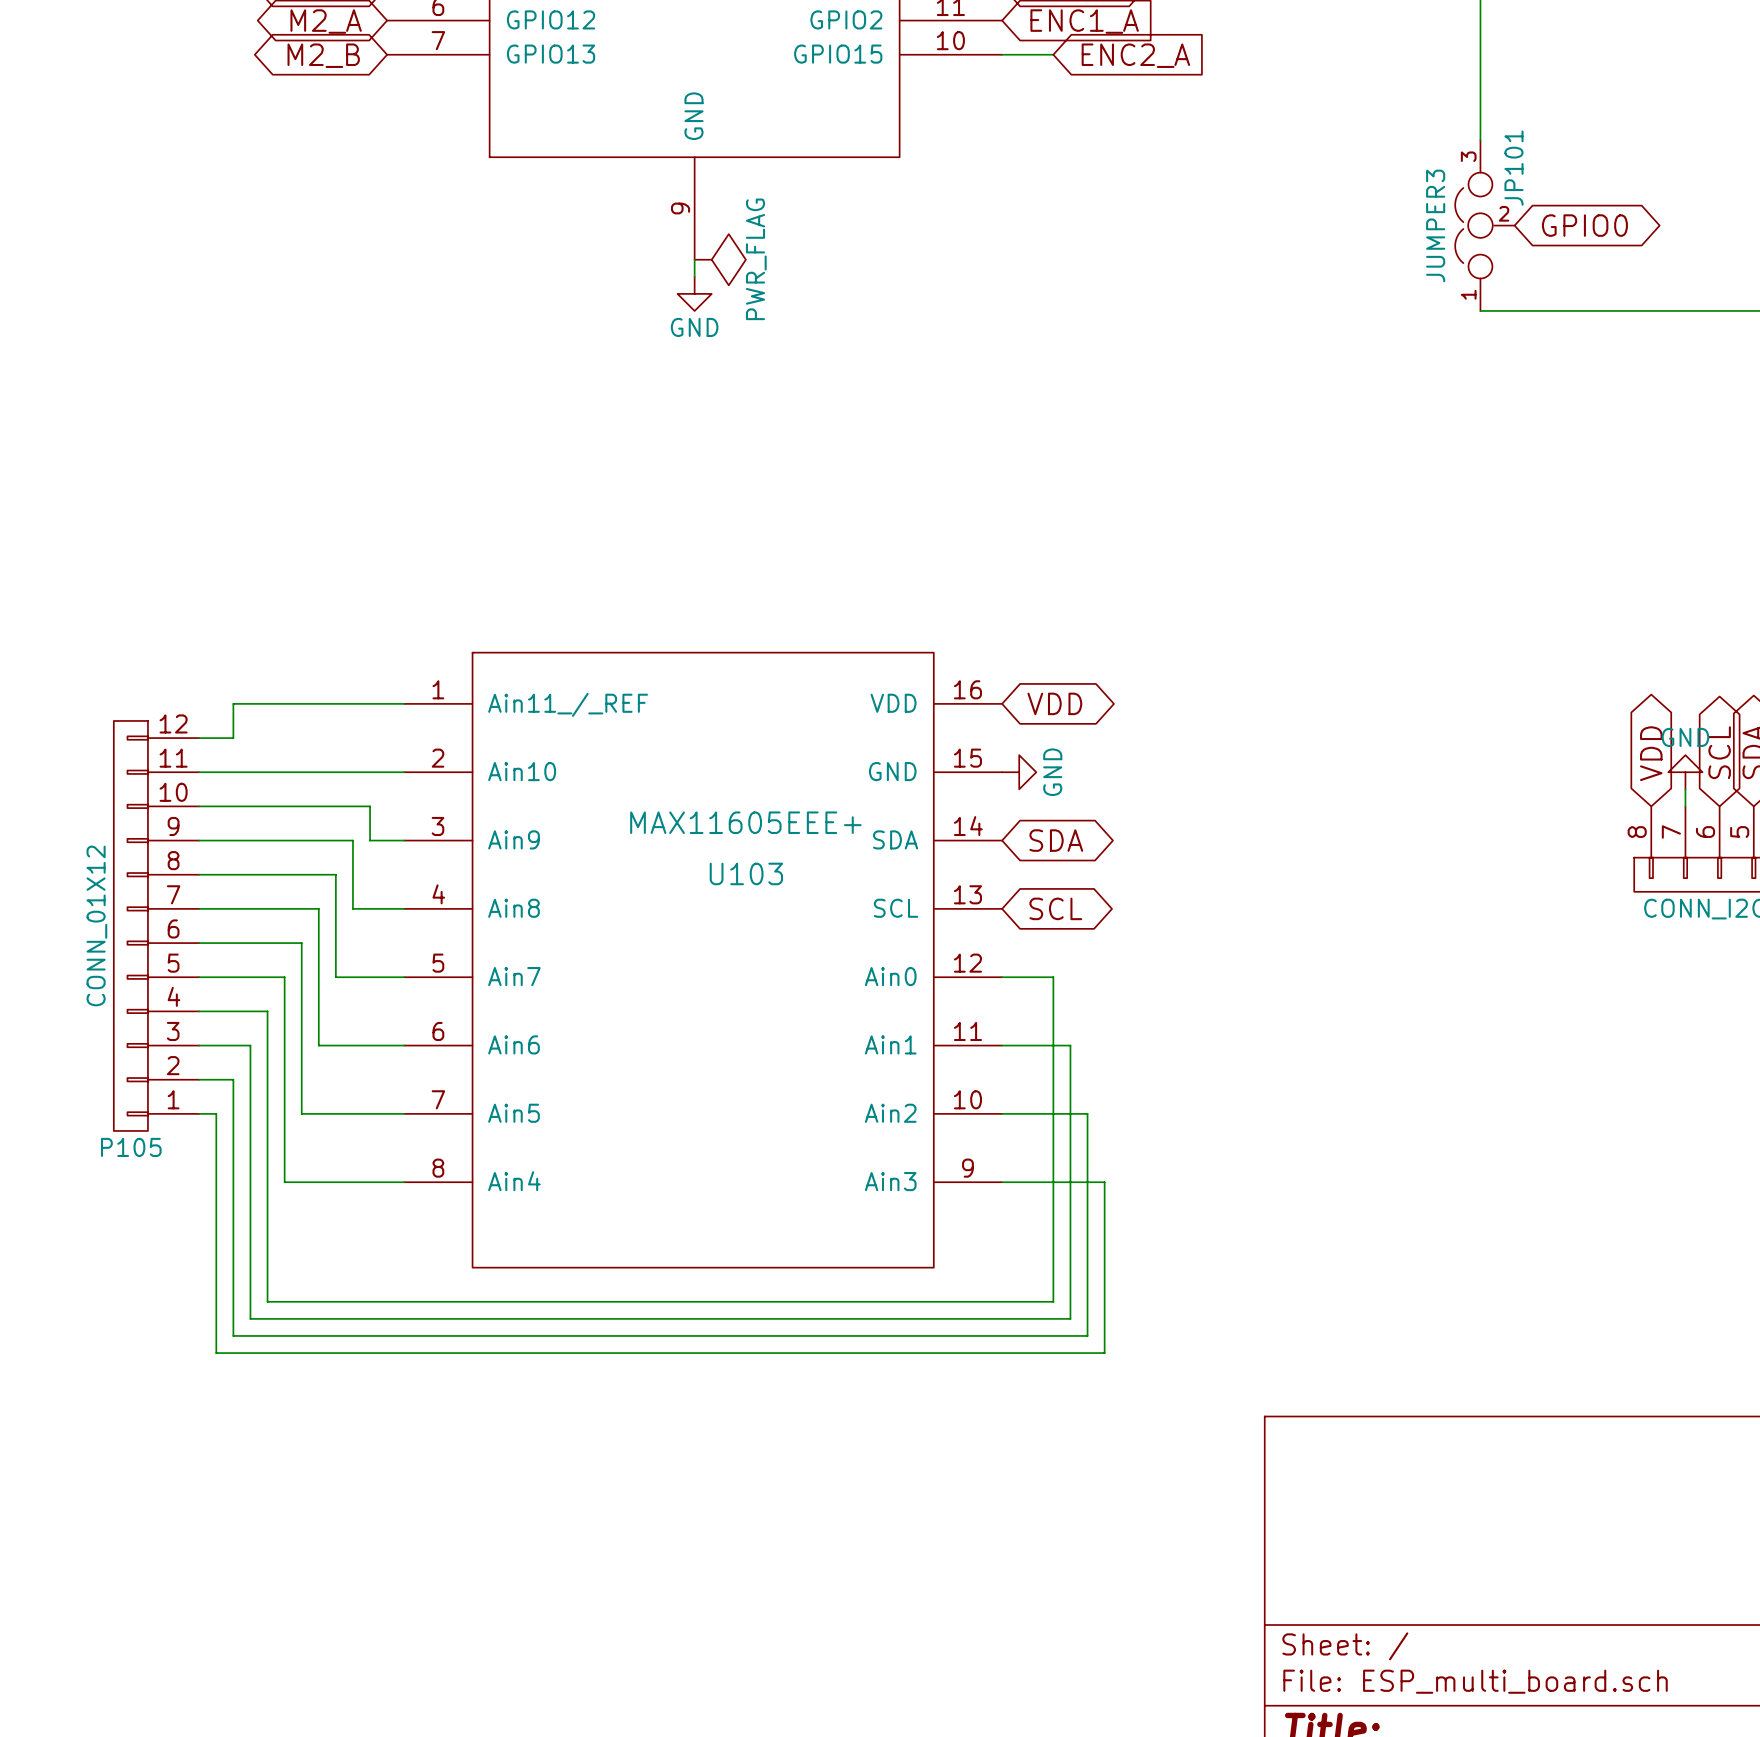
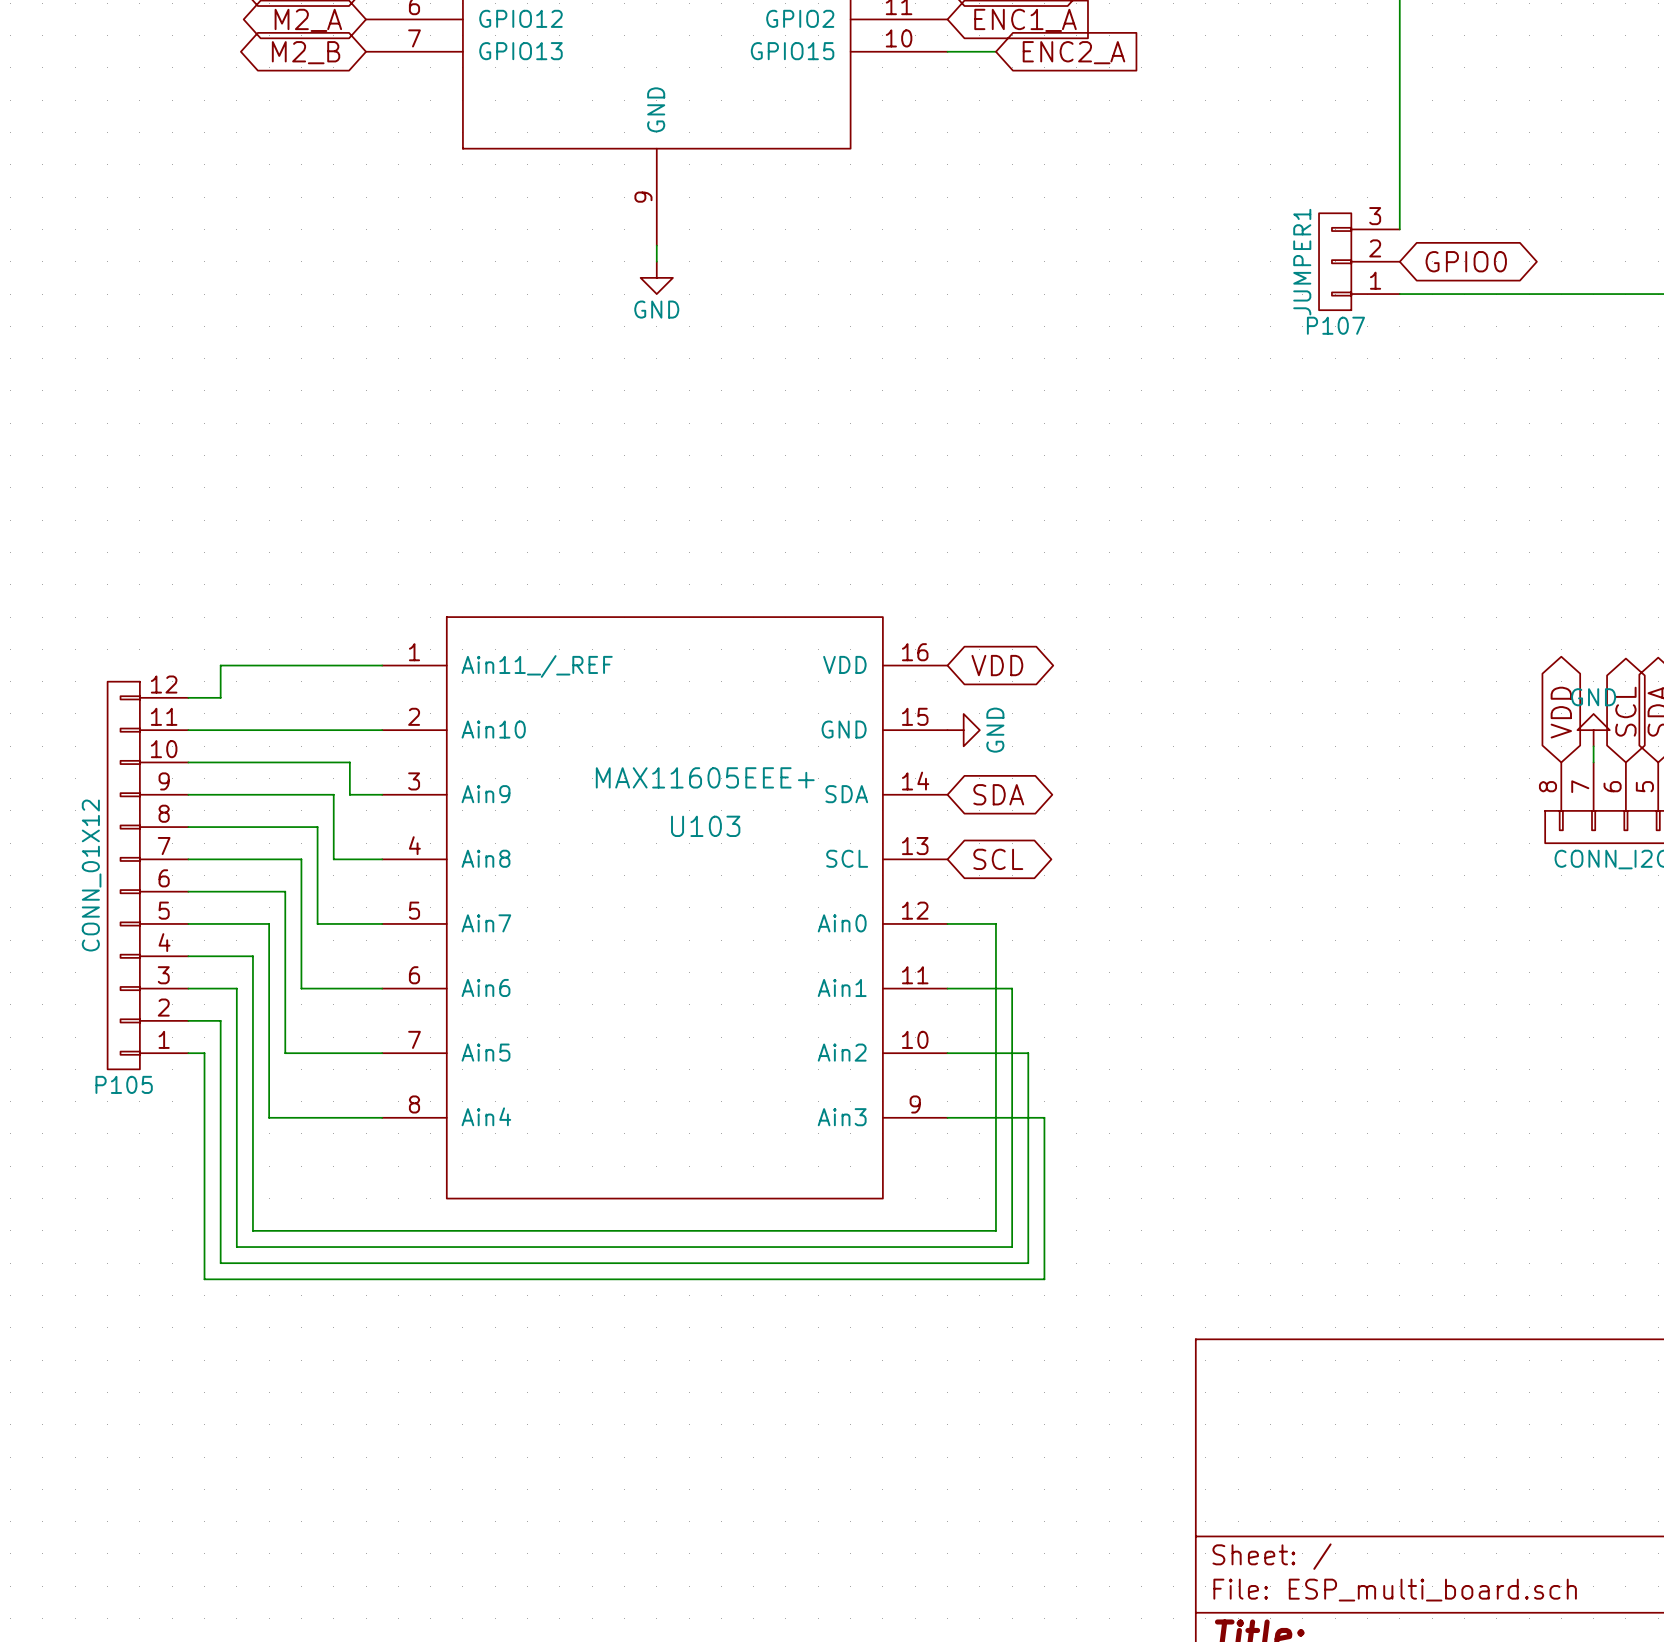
wire: none -> (1399, 132) (1399, 229)
JP101: JUMPER3 (1484, 225) -> none
global label position: GPIO0 (1584, 225) -> GPIO0 (1466, 261)
power symbol: PWR_FLAG (720, 259) -> none
P107: none -> JUMPER1 (1359, 261)

